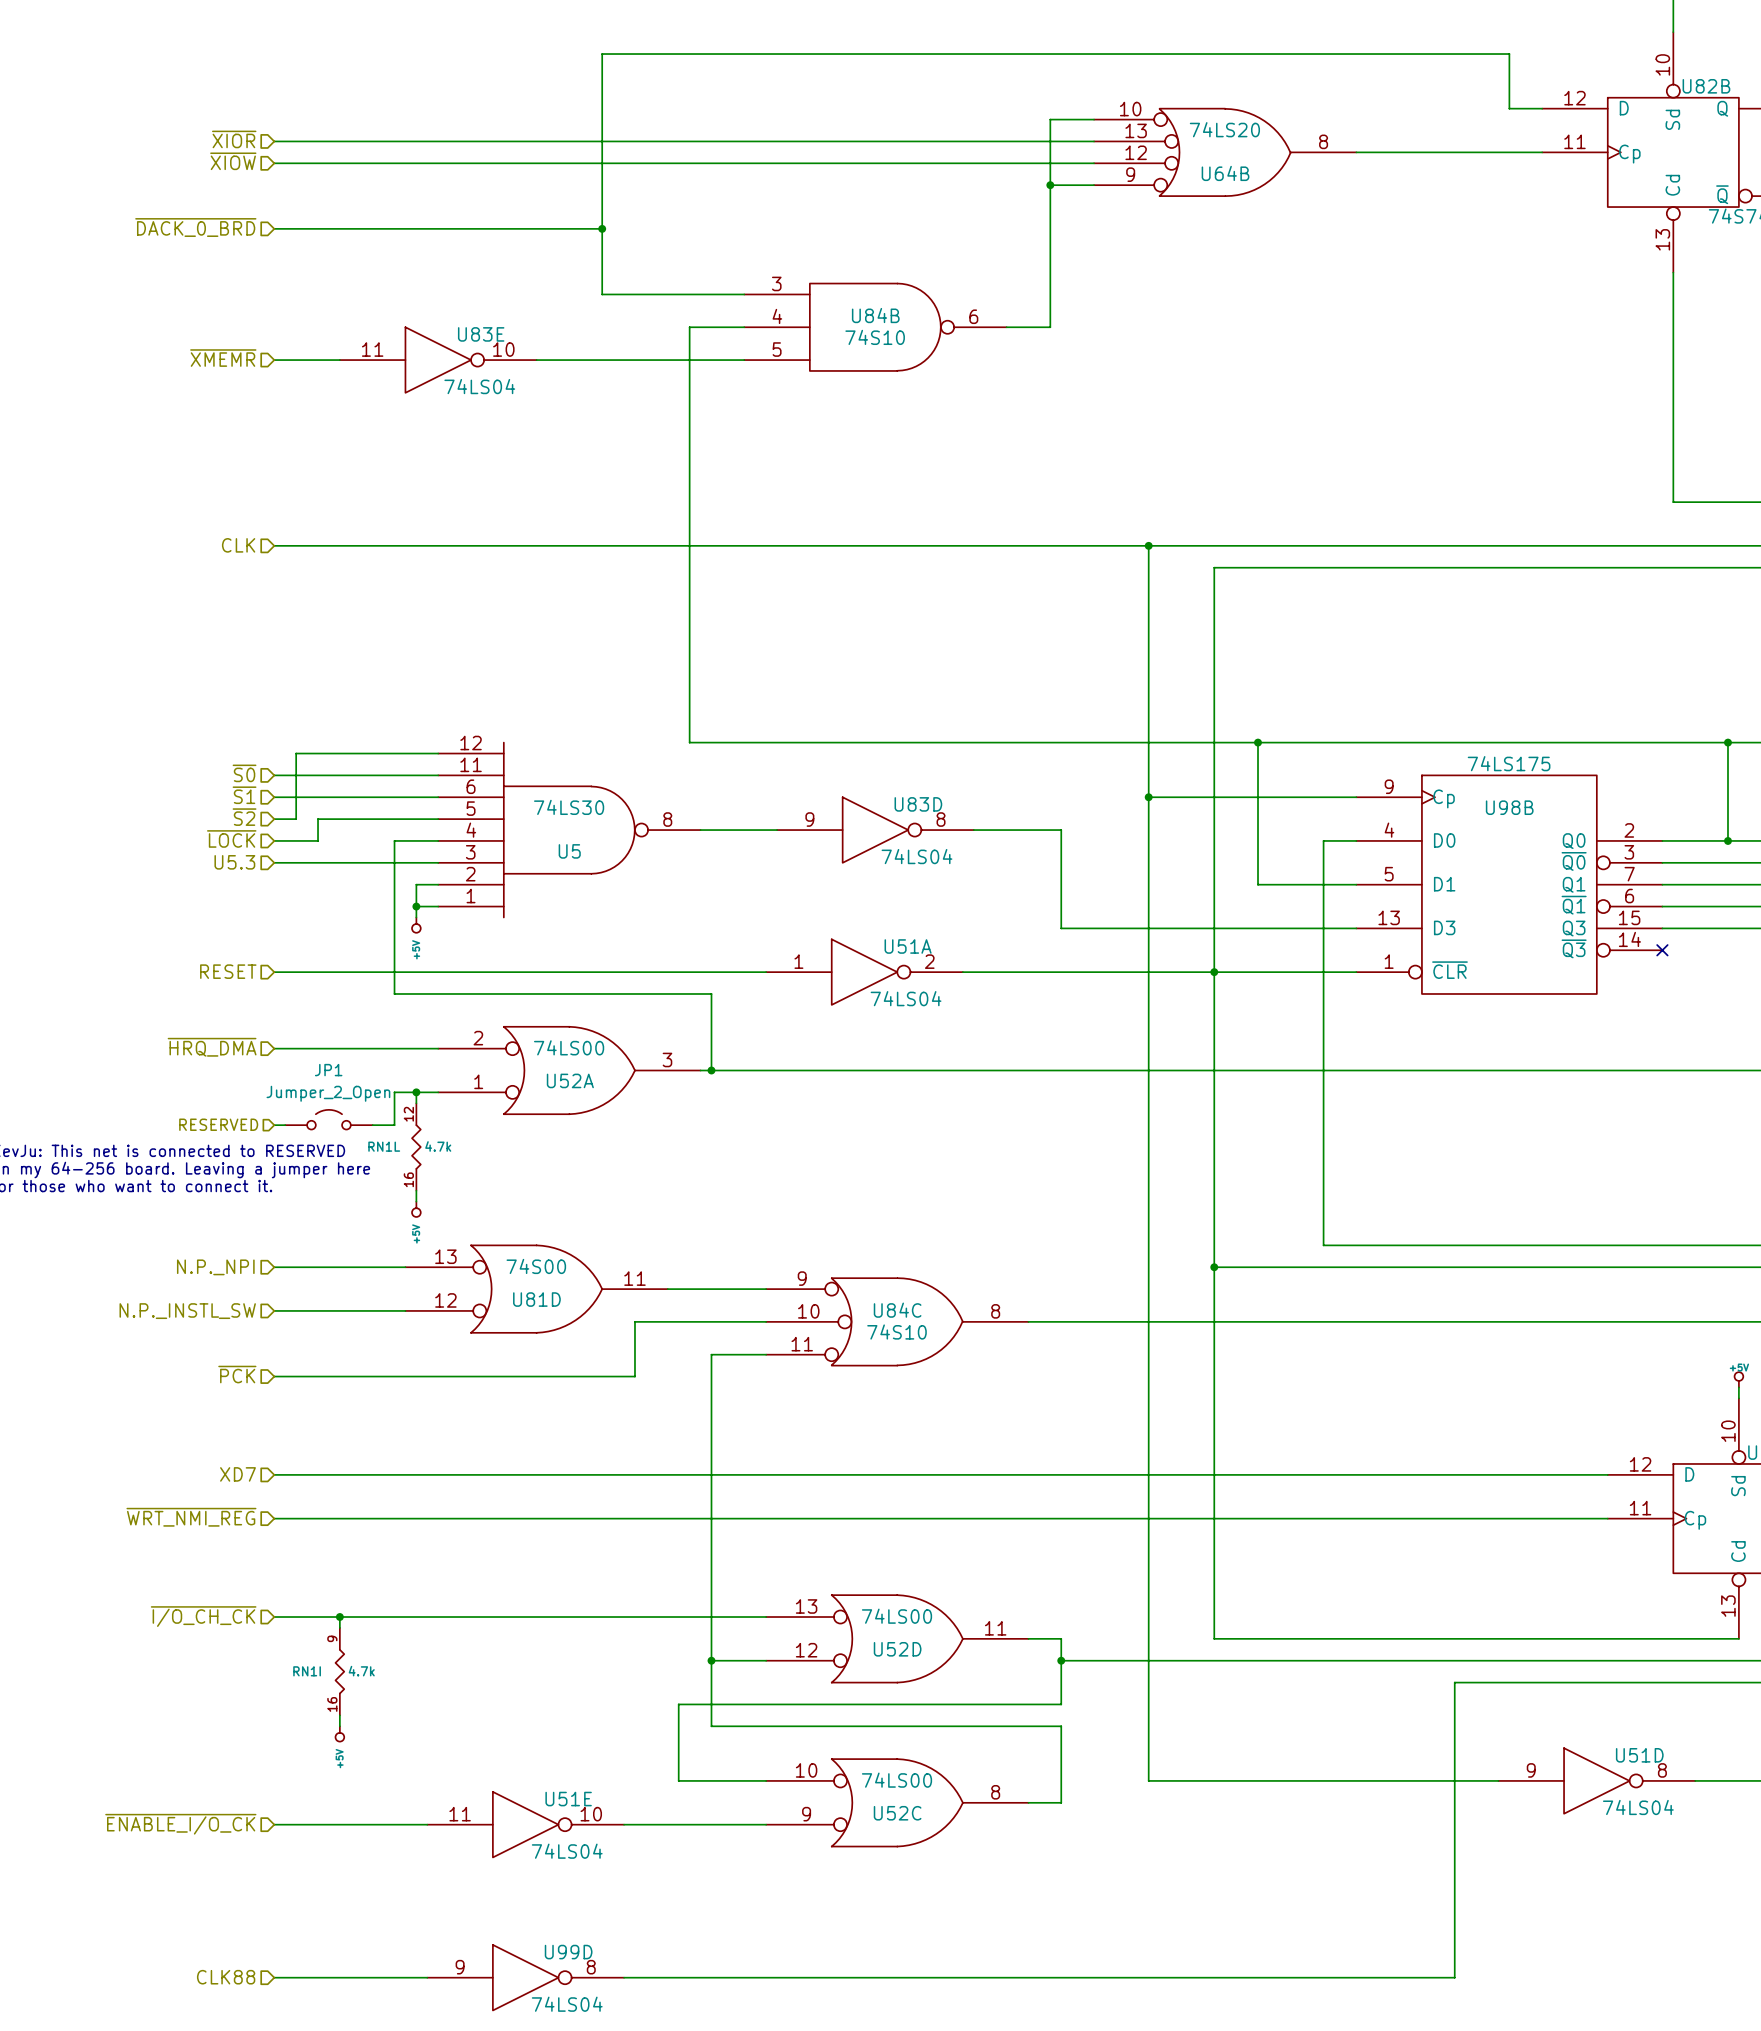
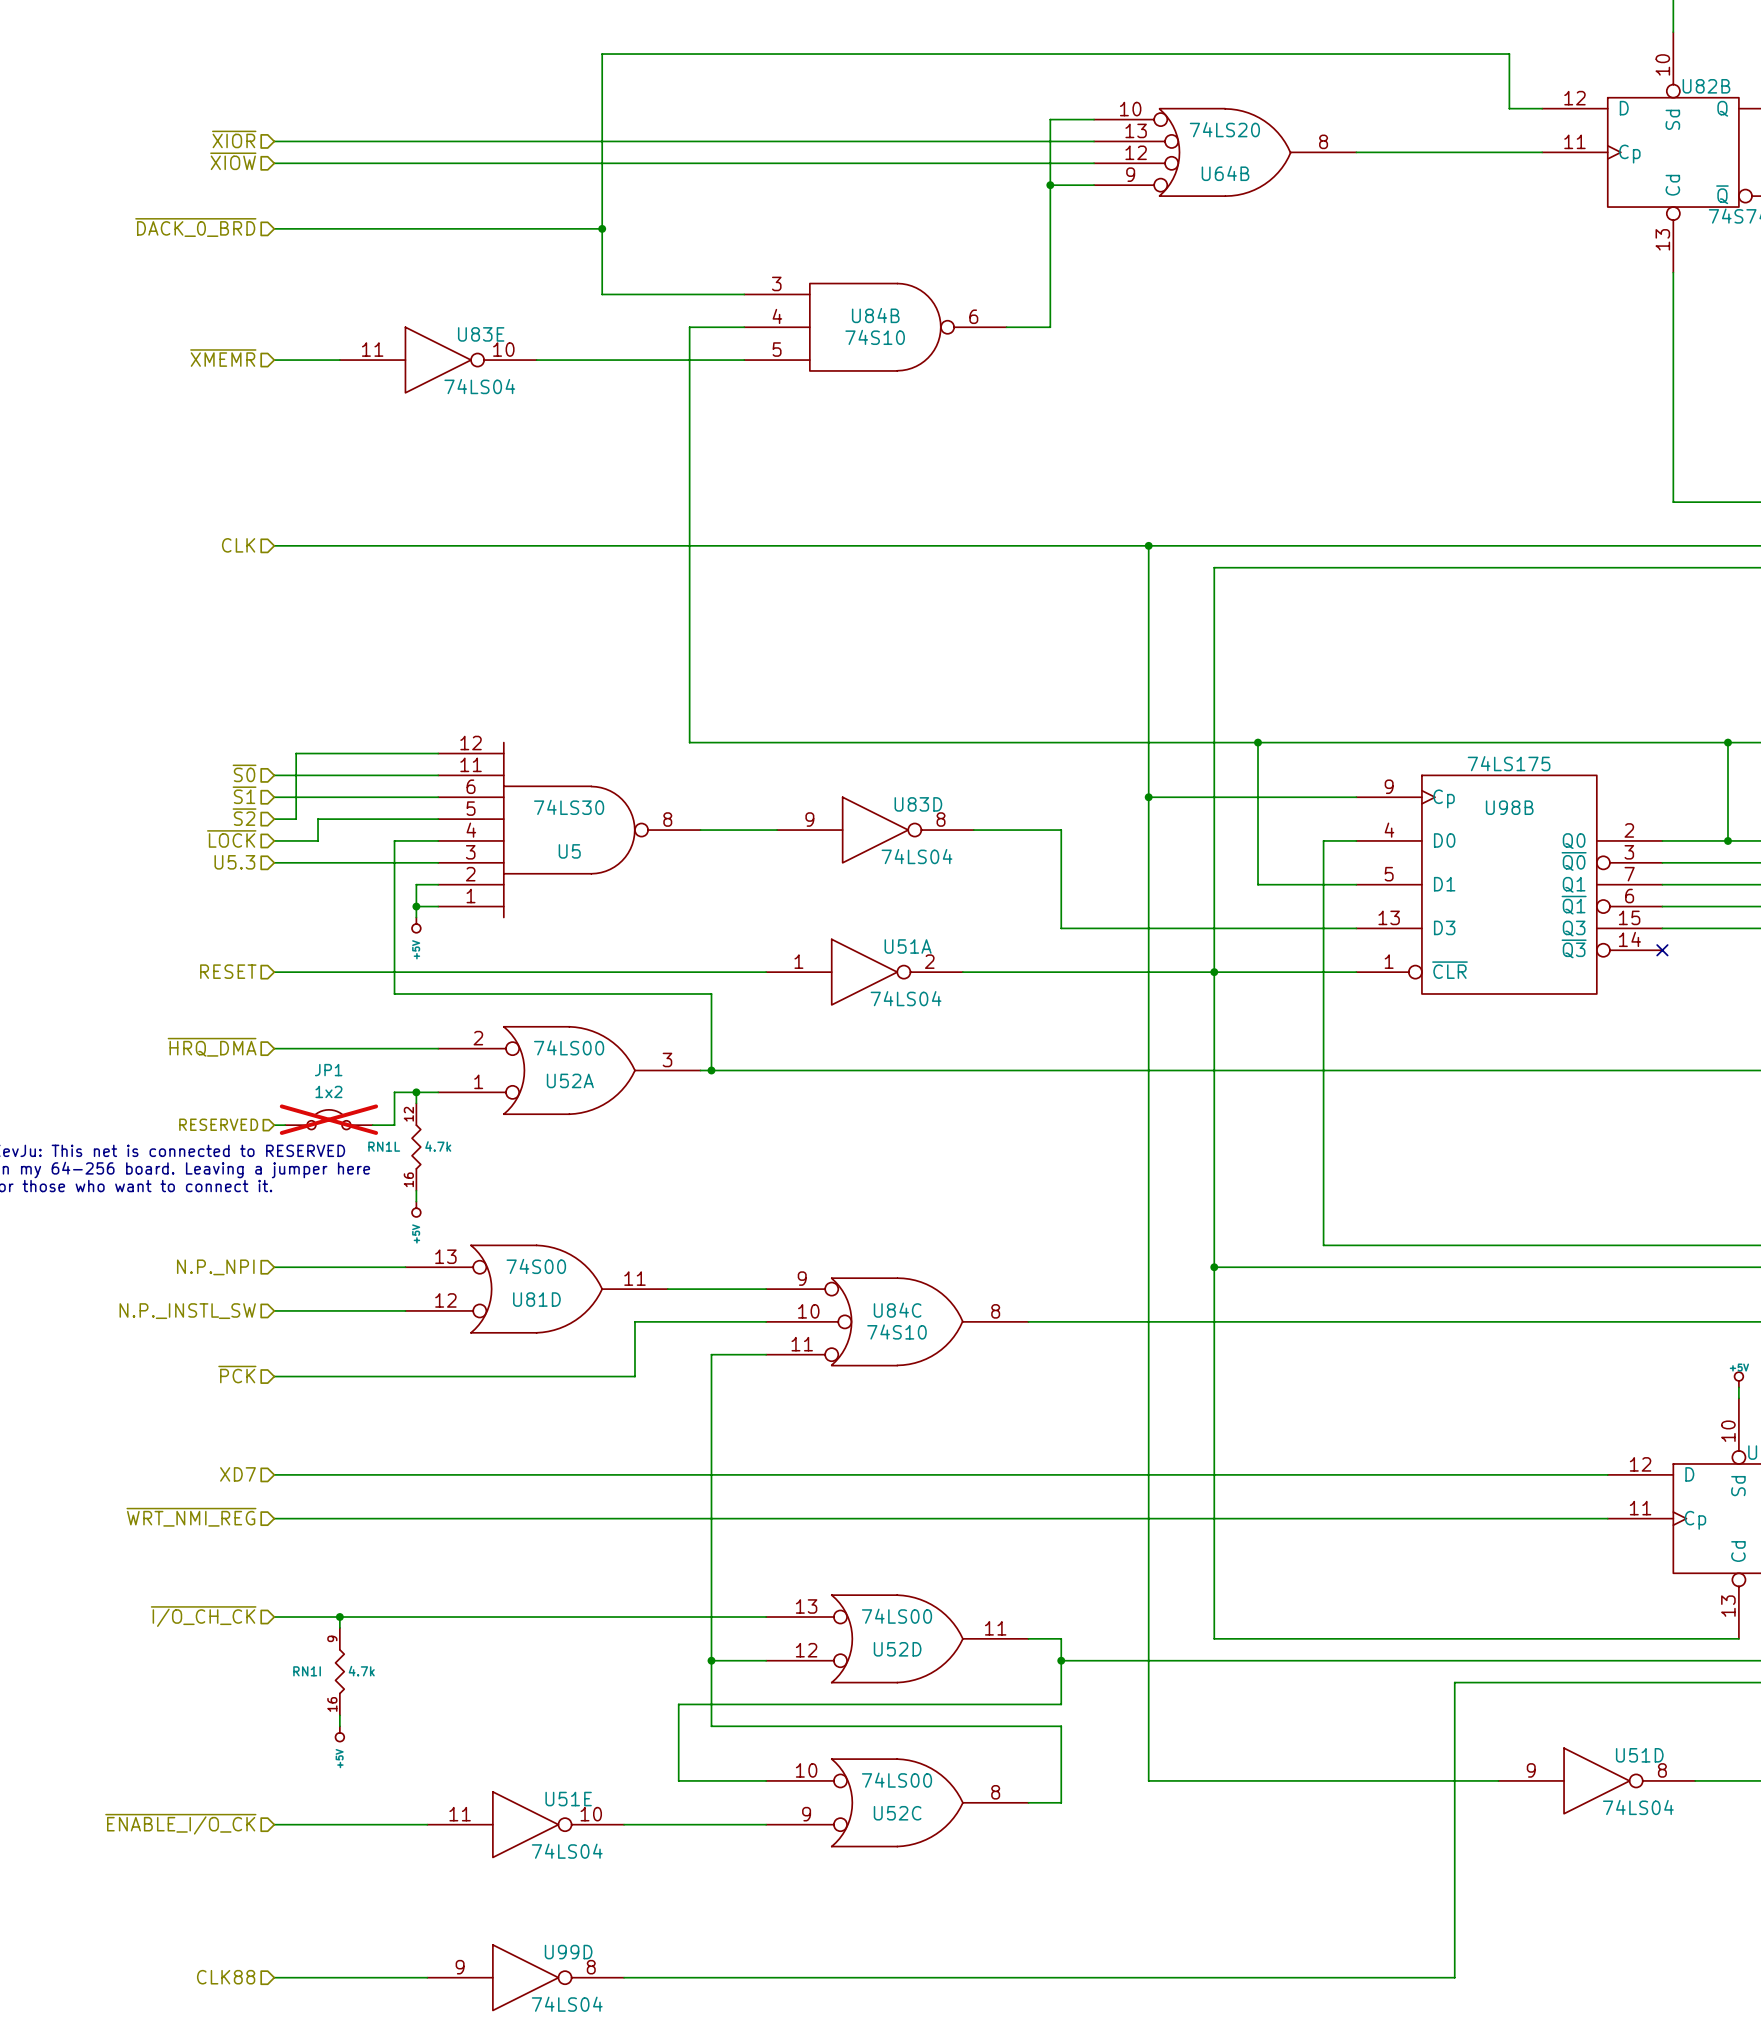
JP1 value: Jumper_2_Open (328, 1093) -> 1x2 (328, 1091)
JP1 do-not-place cross: none -> (328, 1119)

